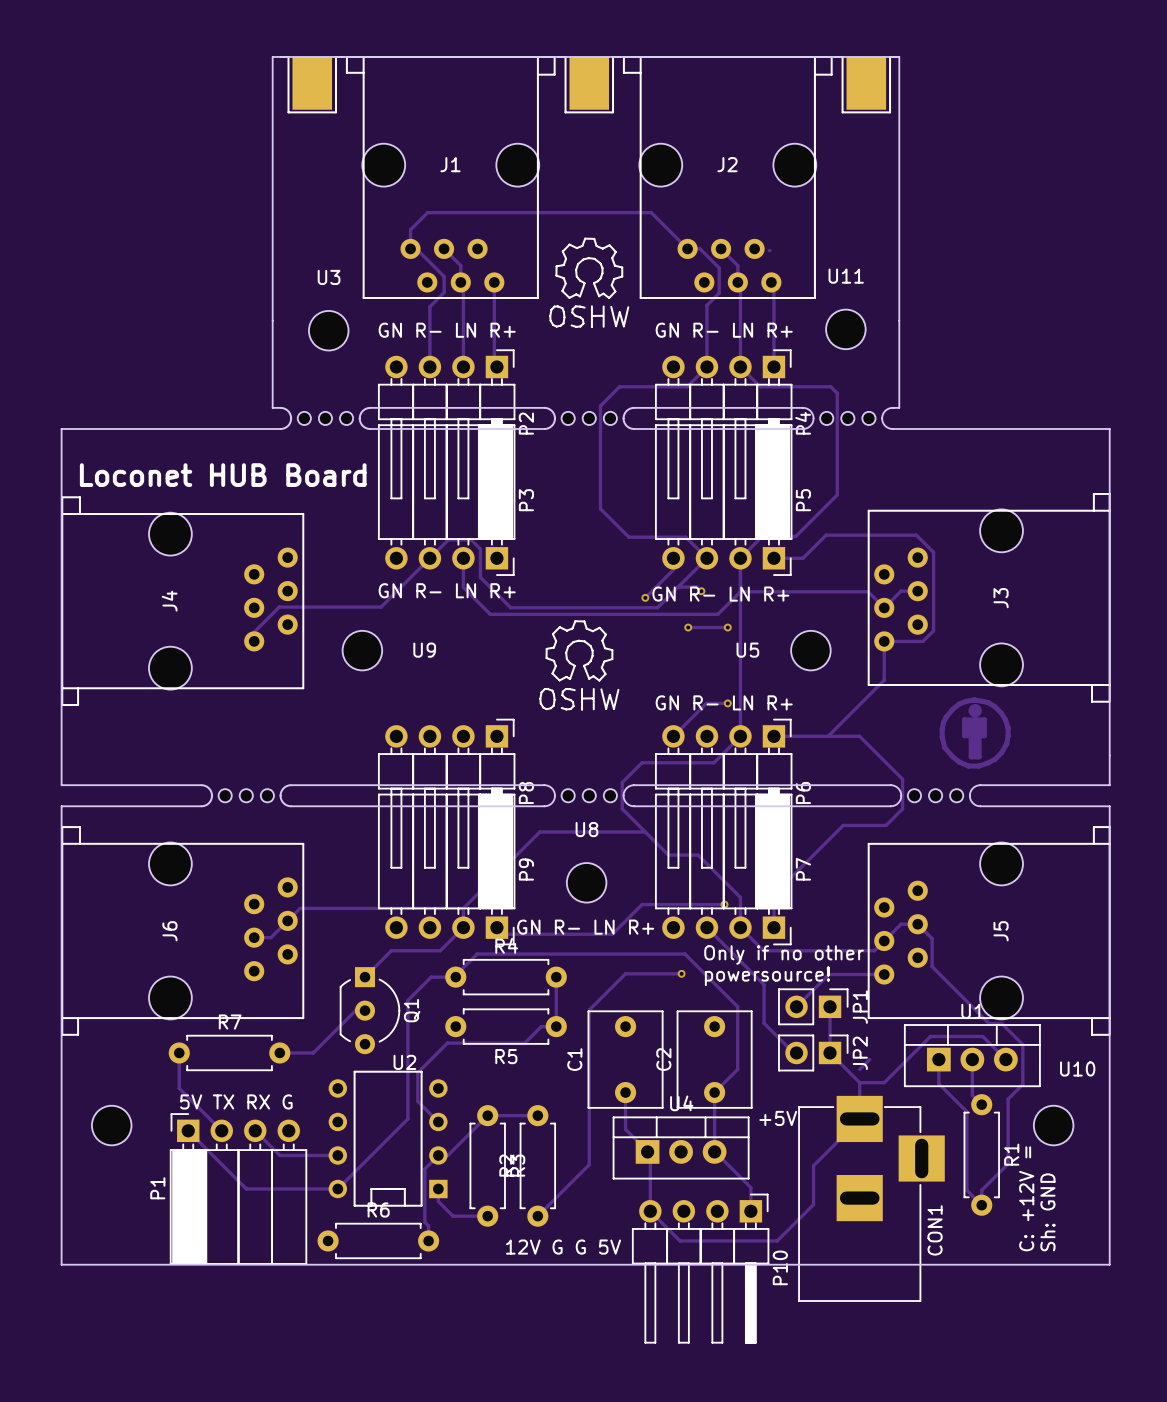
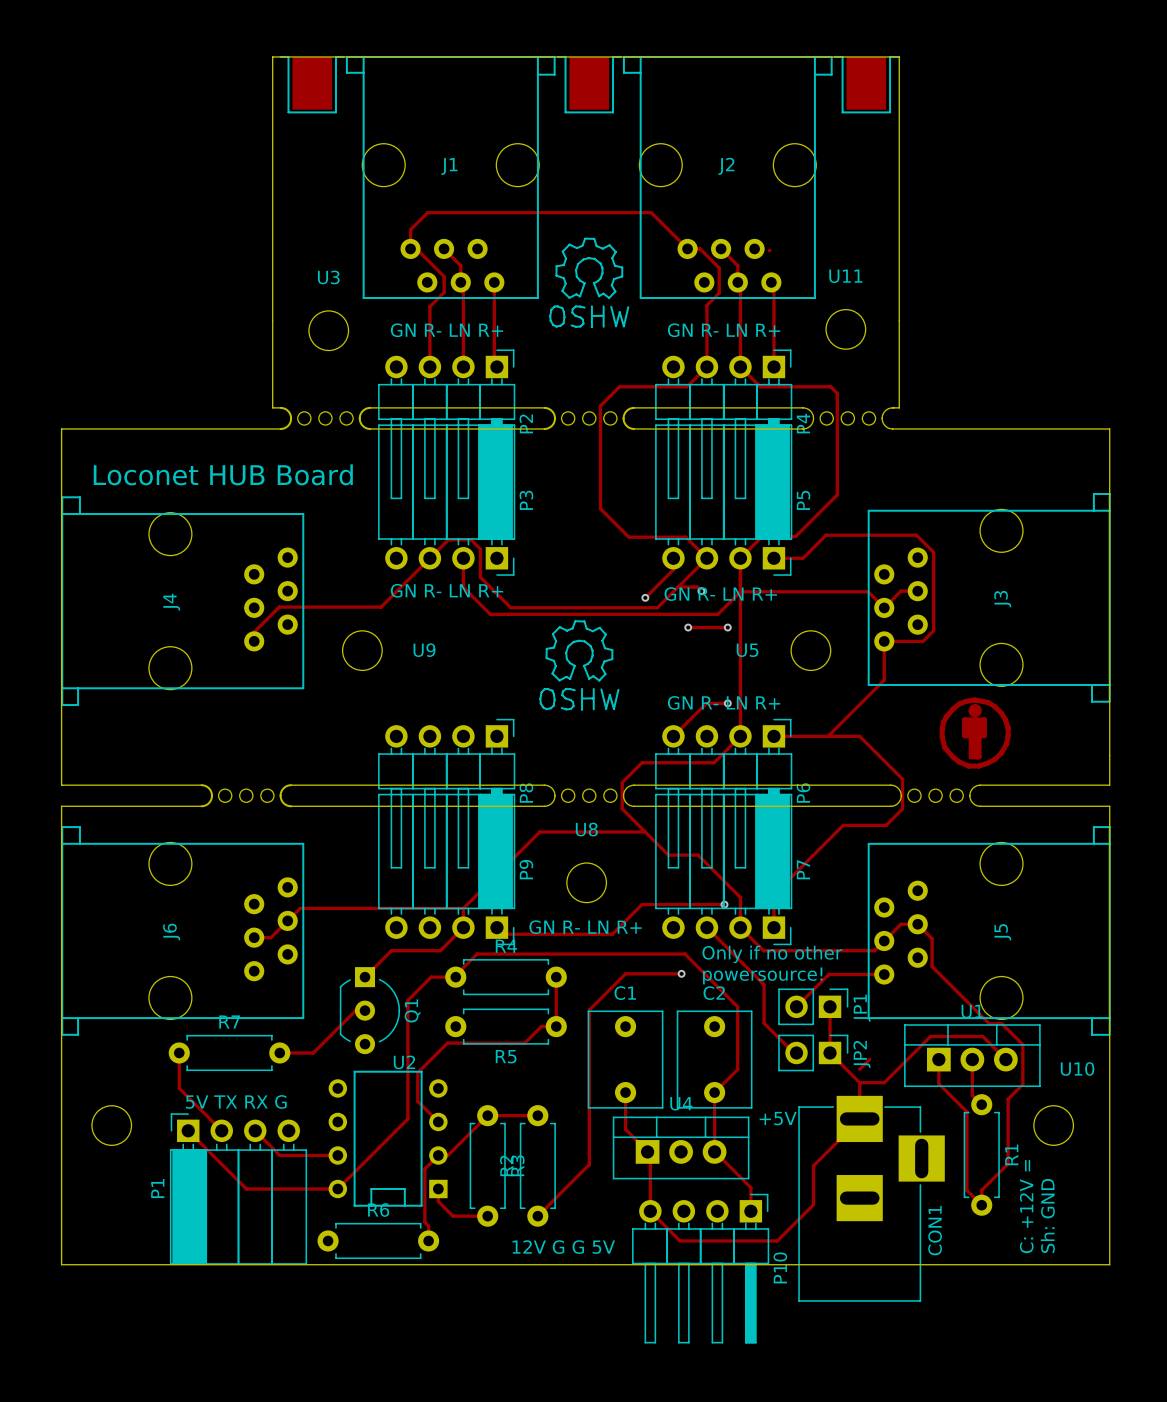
C1 name rotation: 0° (574, 1059) -> 90° clockwise (625, 993)
C1 name position: C1 (574, 1059) -> C1 (625, 993)
C2 name rotation: 0° (663, 1059) -> 90° clockwise (714, 993)
C2 name position: C2 (663, 1059) -> C2 (714, 993)

